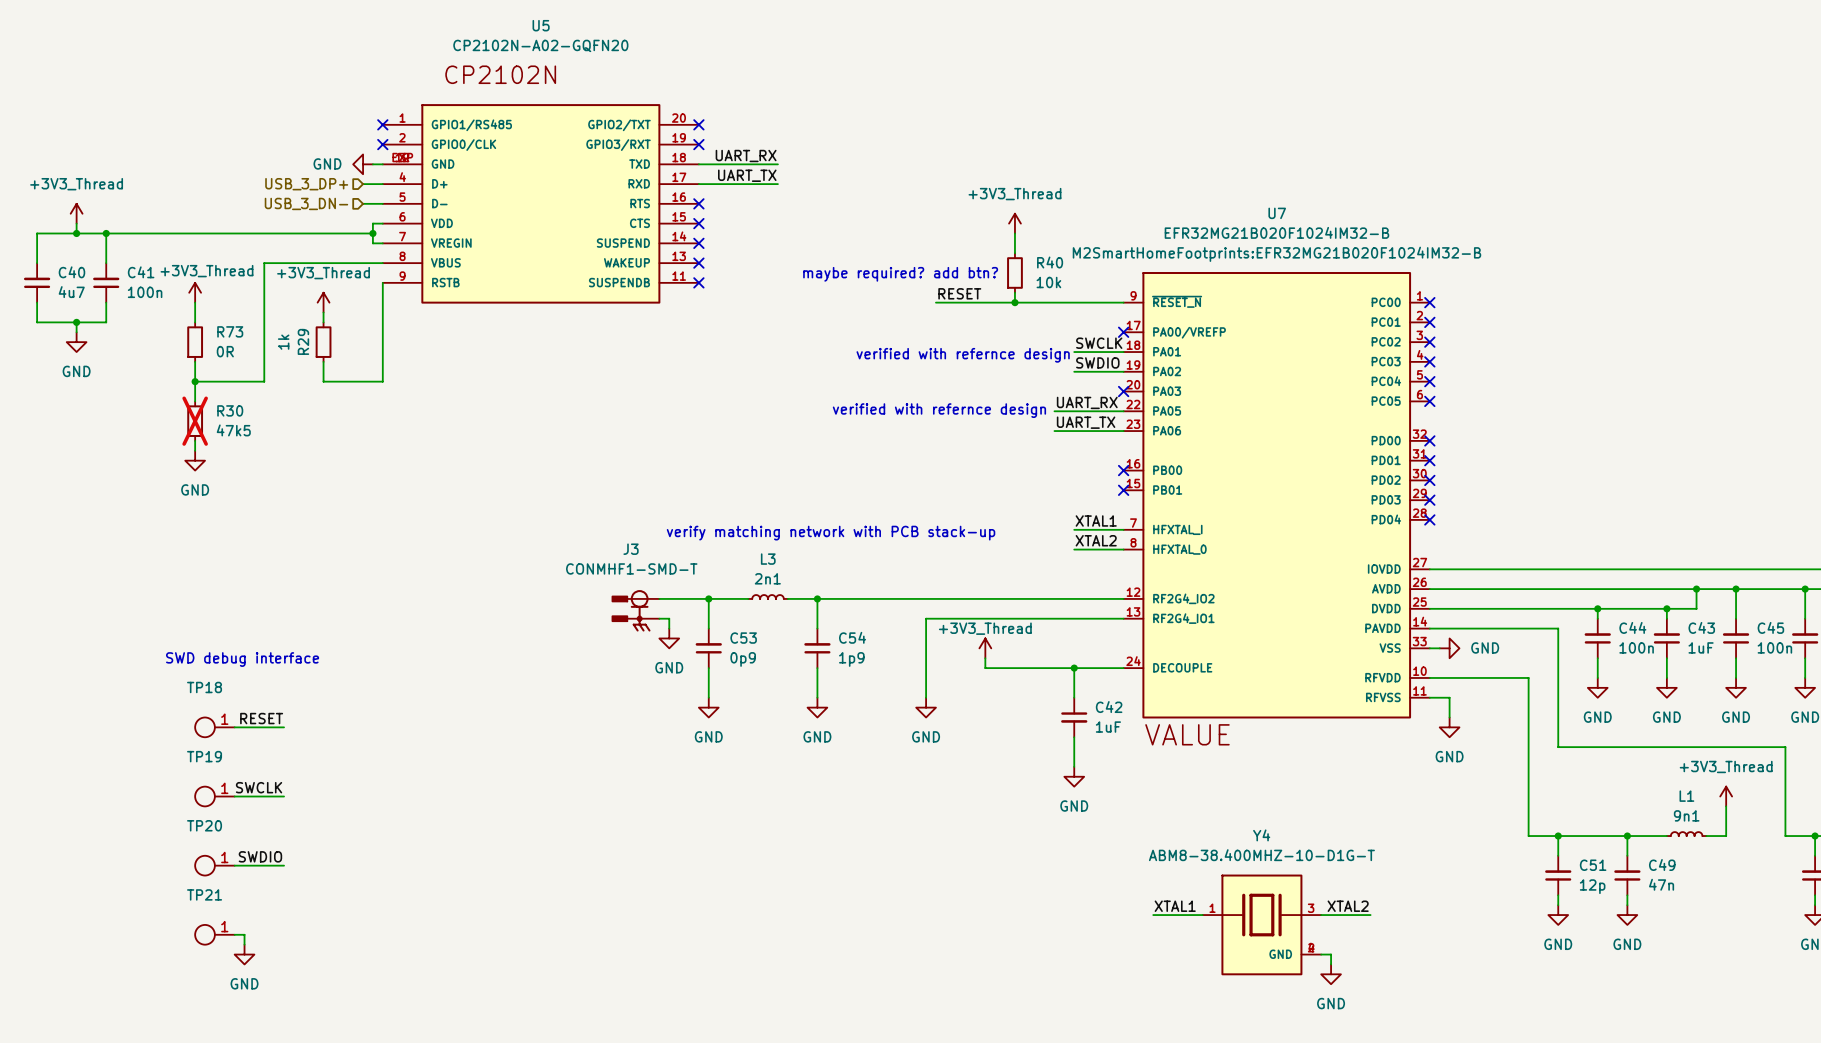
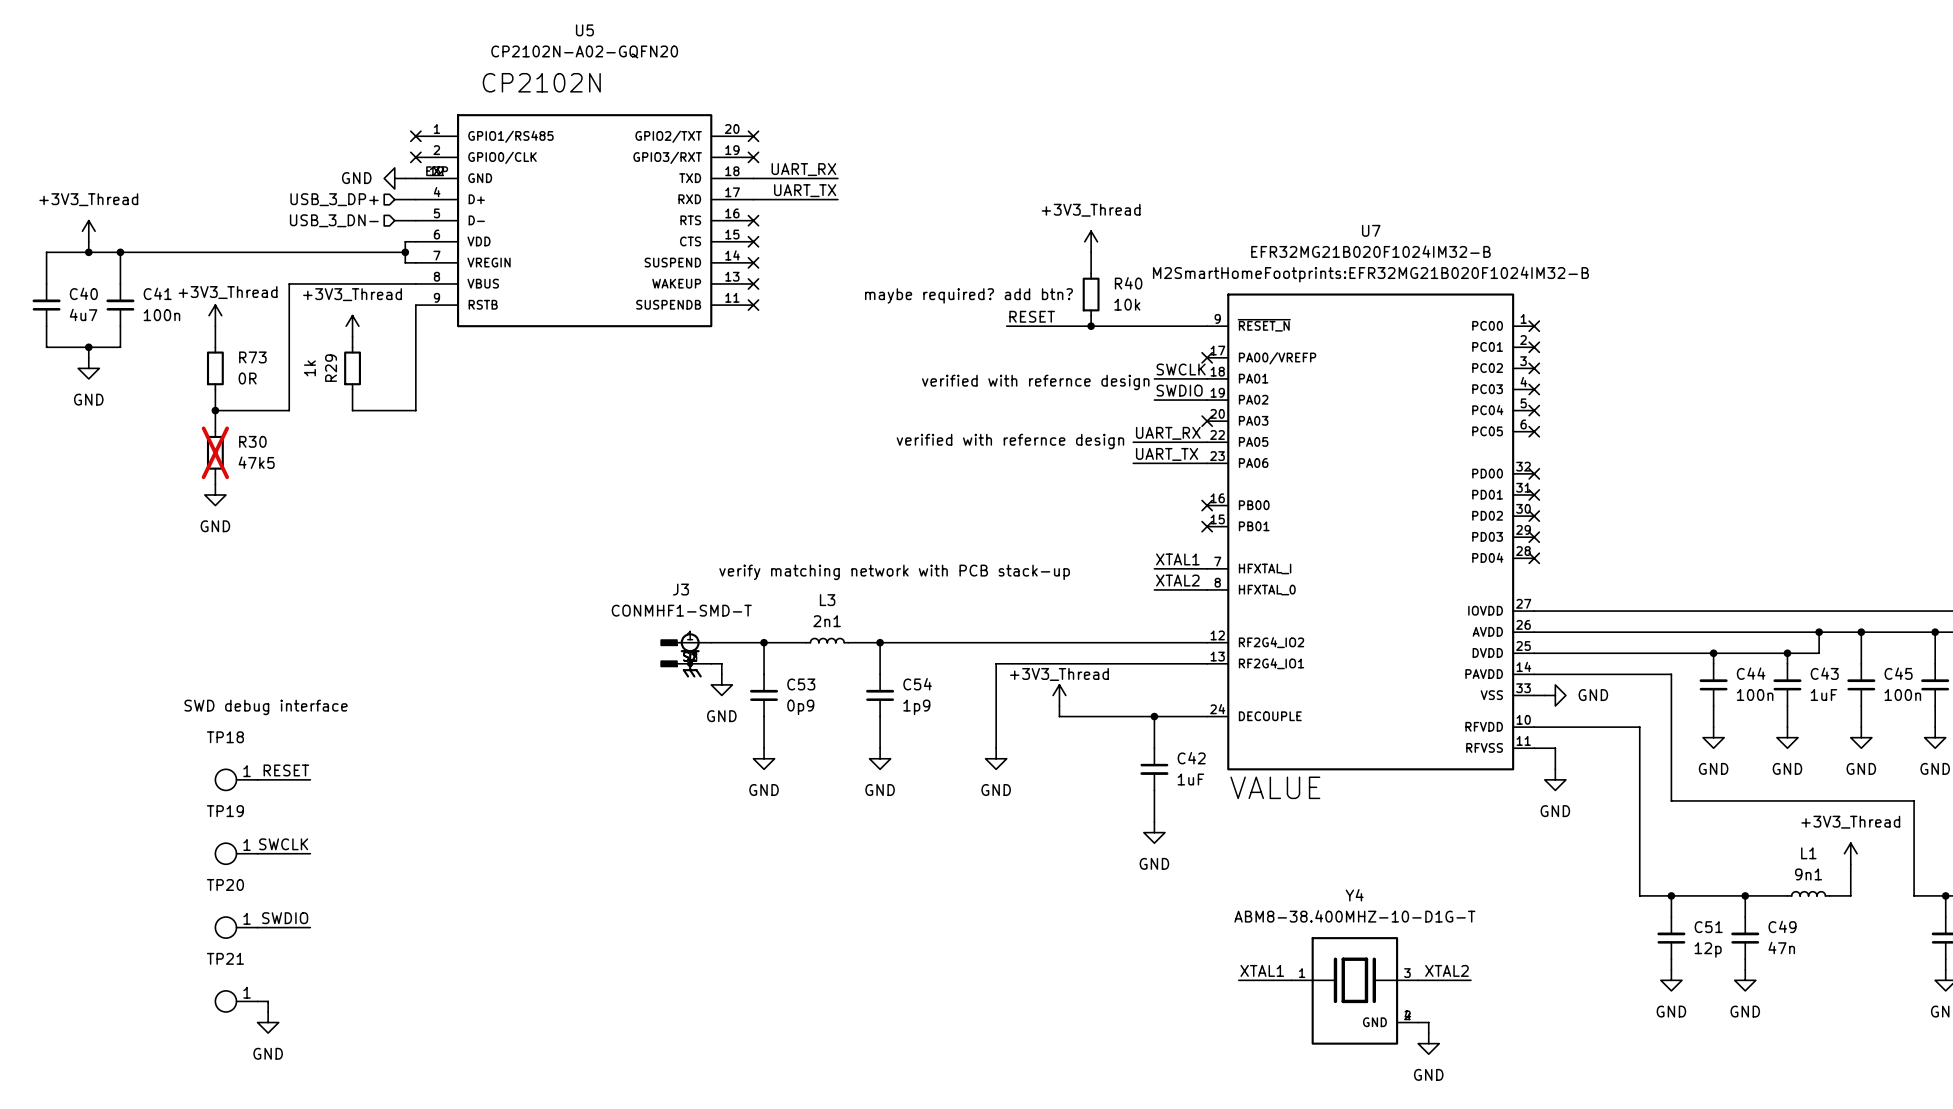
J3 symbol: [612, 590, 660, 632] -> [660, 633, 712, 678]

